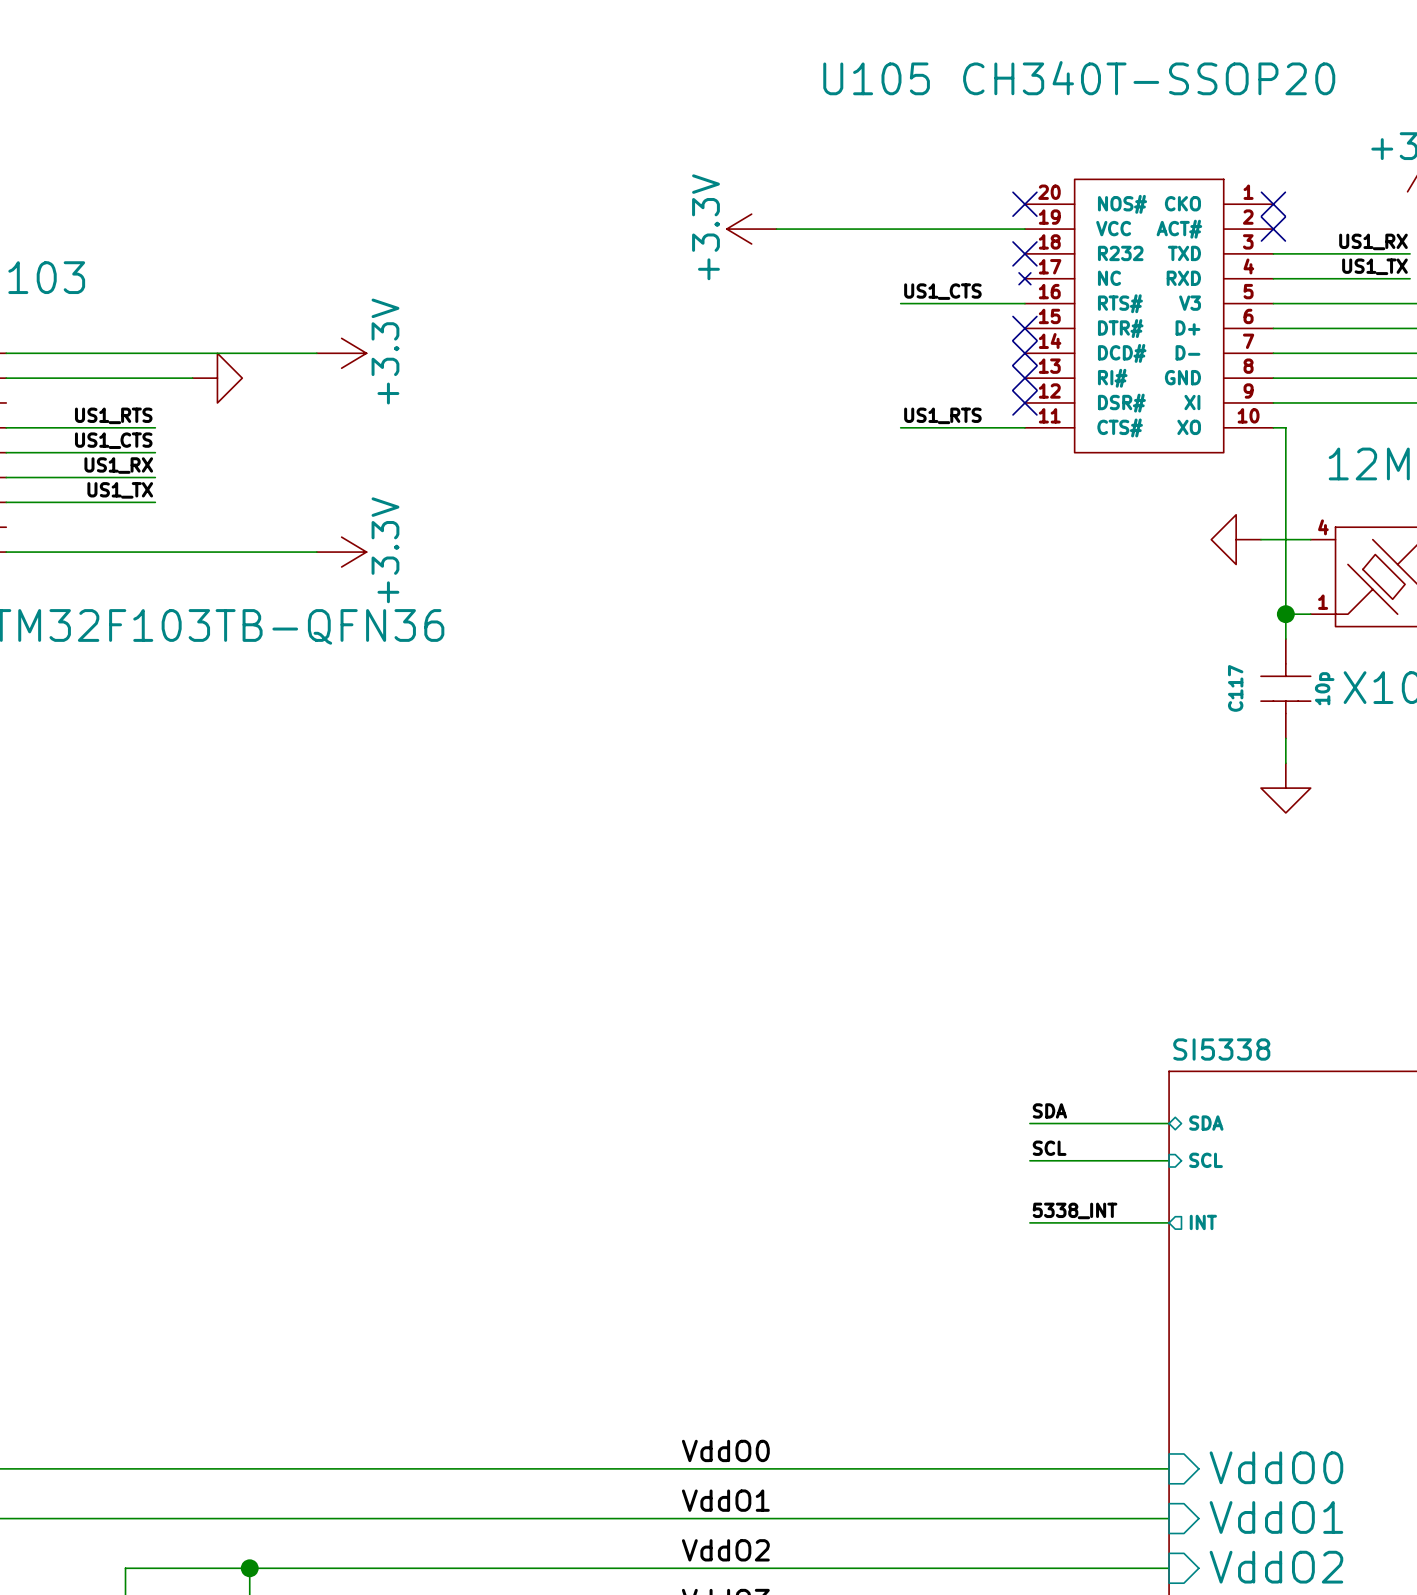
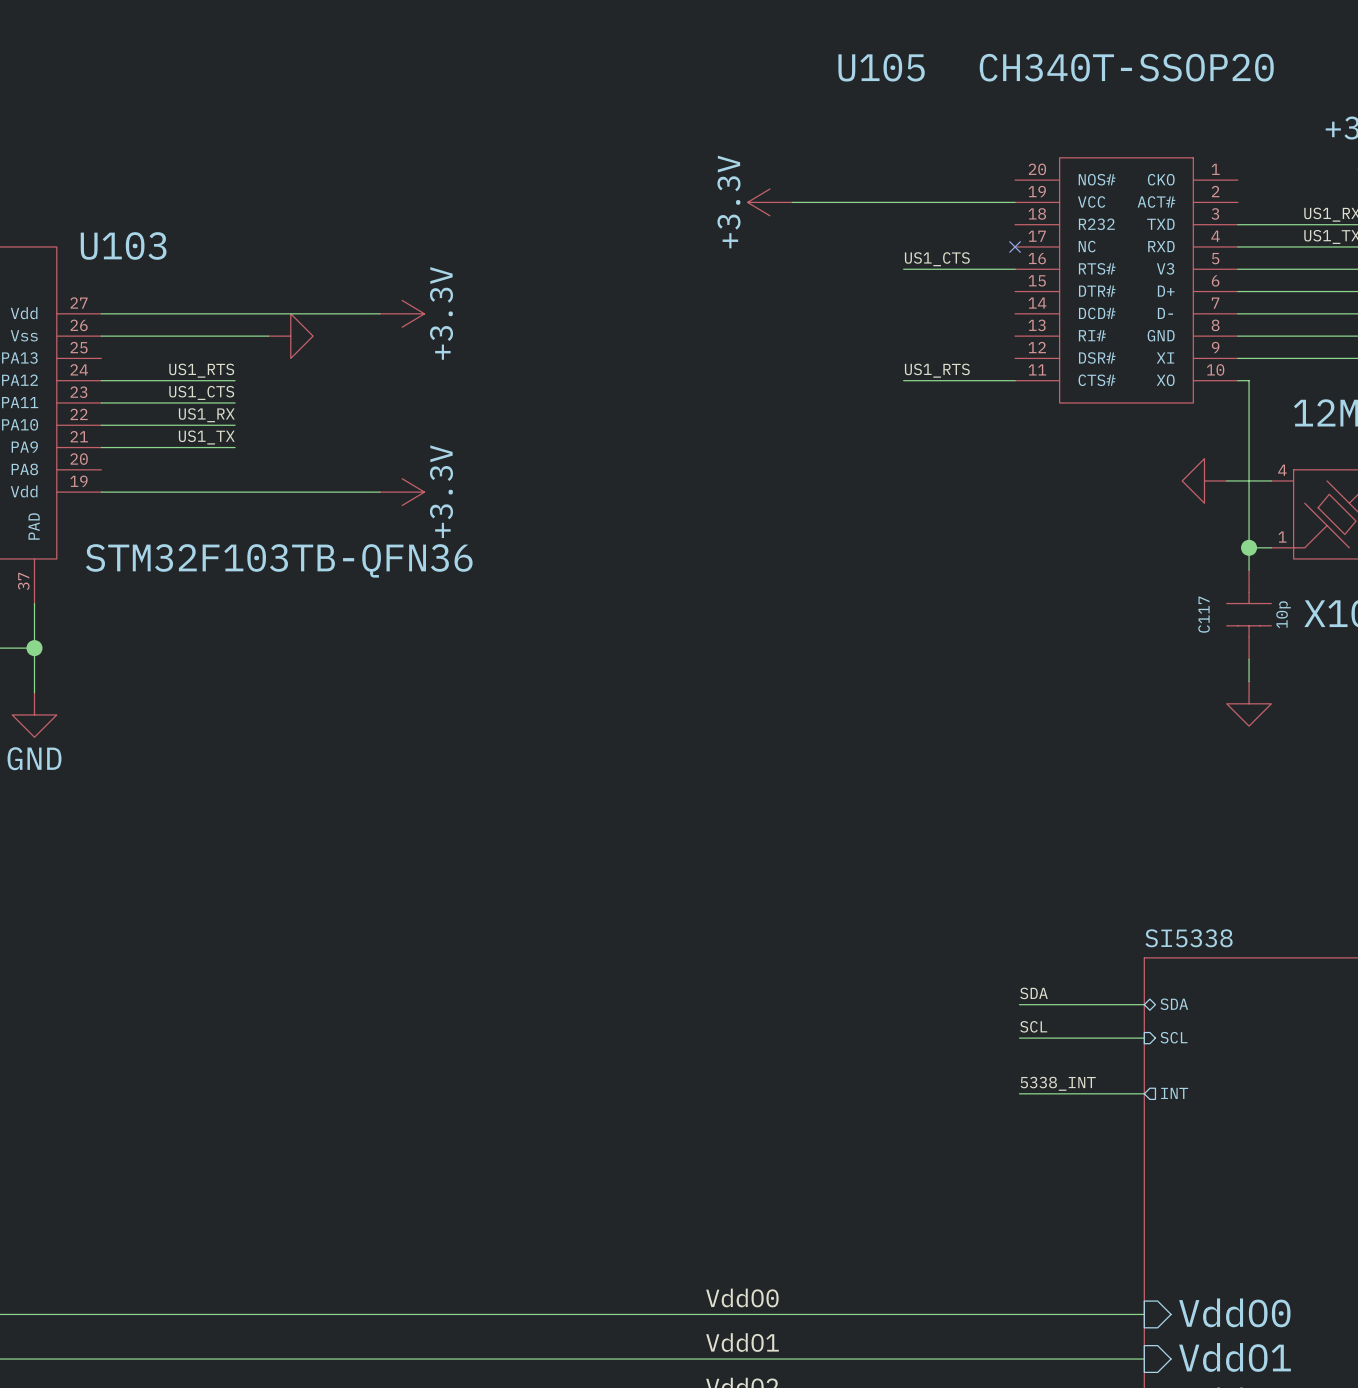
no-connect mark: (1024, 204) -> none
no-connect mark: (1273, 204) -> none
no-connect mark: (1273, 229) -> none
no-connect mark: (1024, 253) -> none
no-connect mark: (1024, 328) -> none
no-connect mark: (1024, 353) -> none
no-connect mark: (1024, 378) -> none
no-connect mark: (1024, 402) -> none

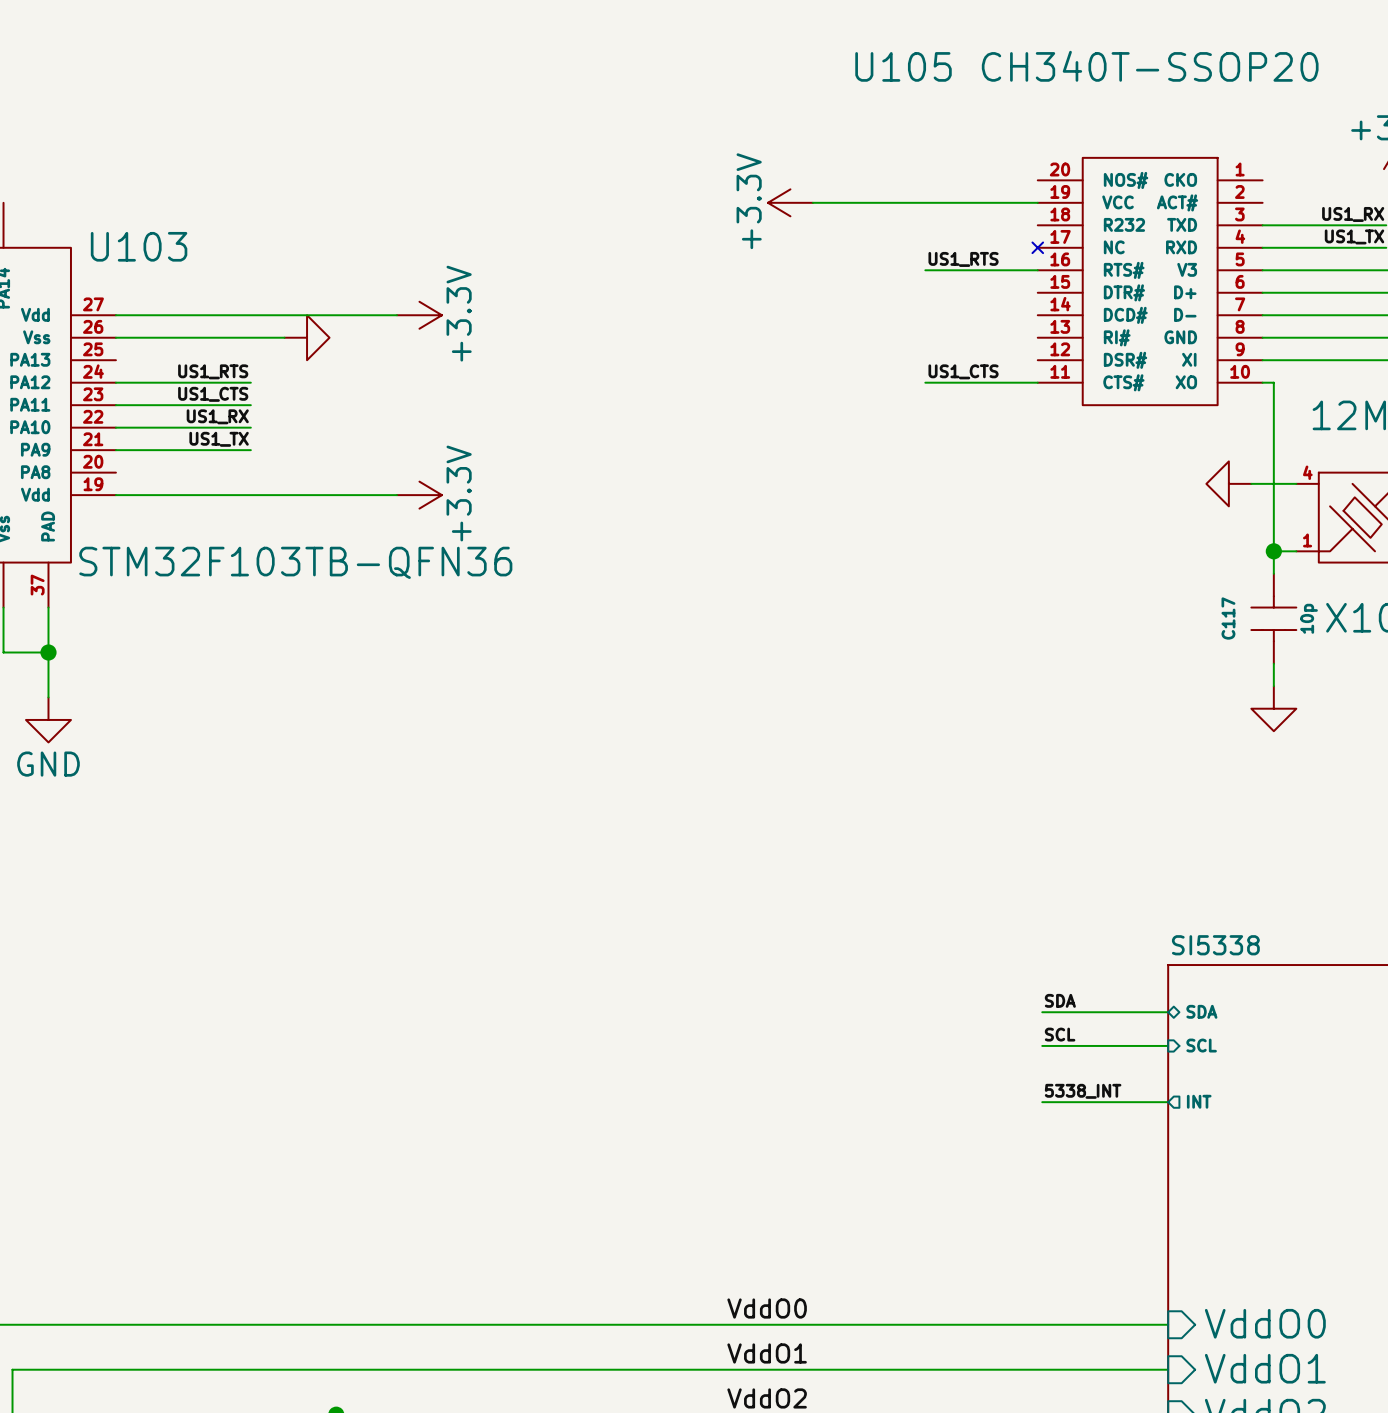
label: US1_CTS (937, 259) -> US1_RTS (963, 259)
label: US1_RTS (937, 370) -> US1_CTS (963, 371)

